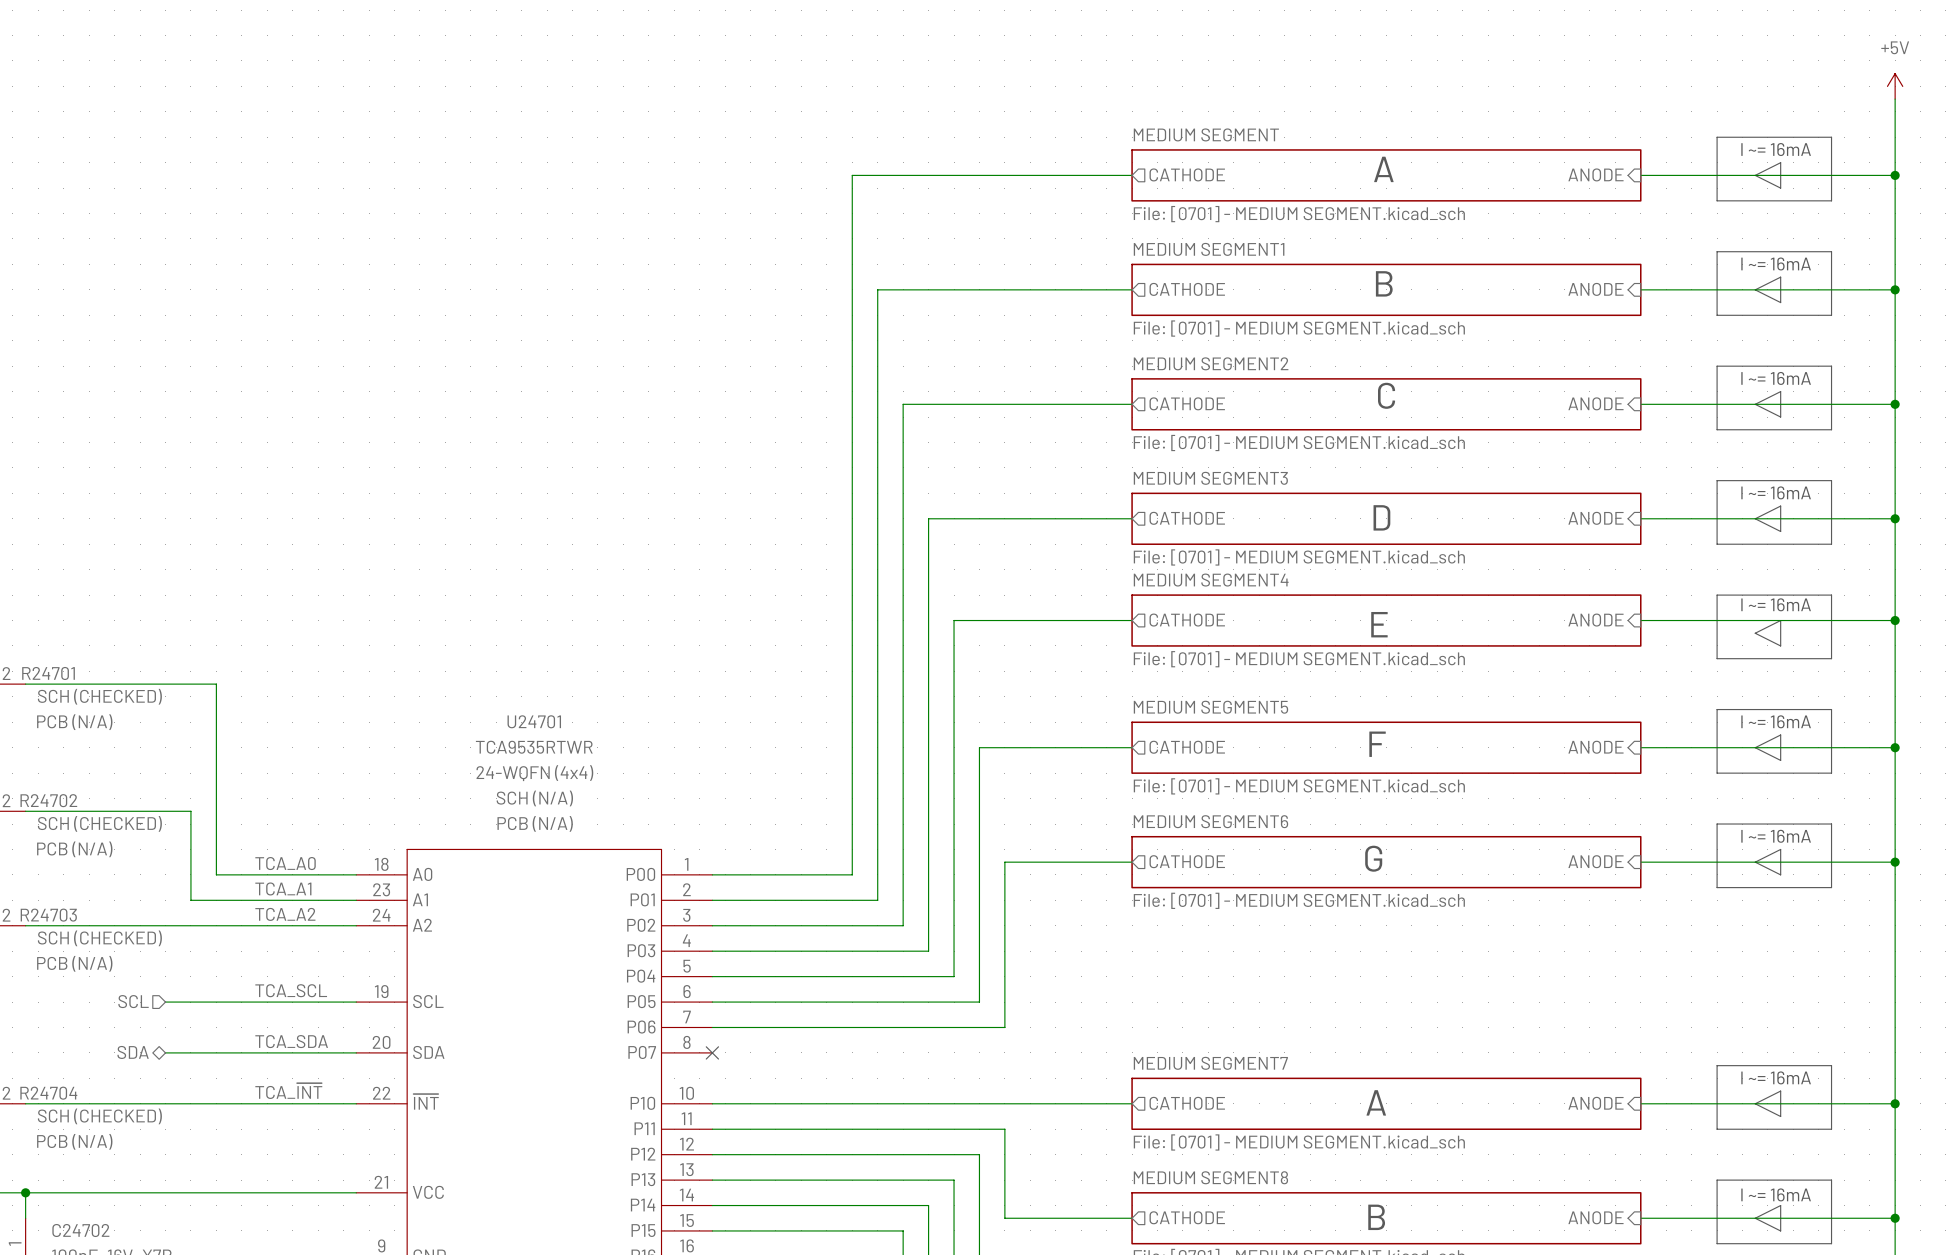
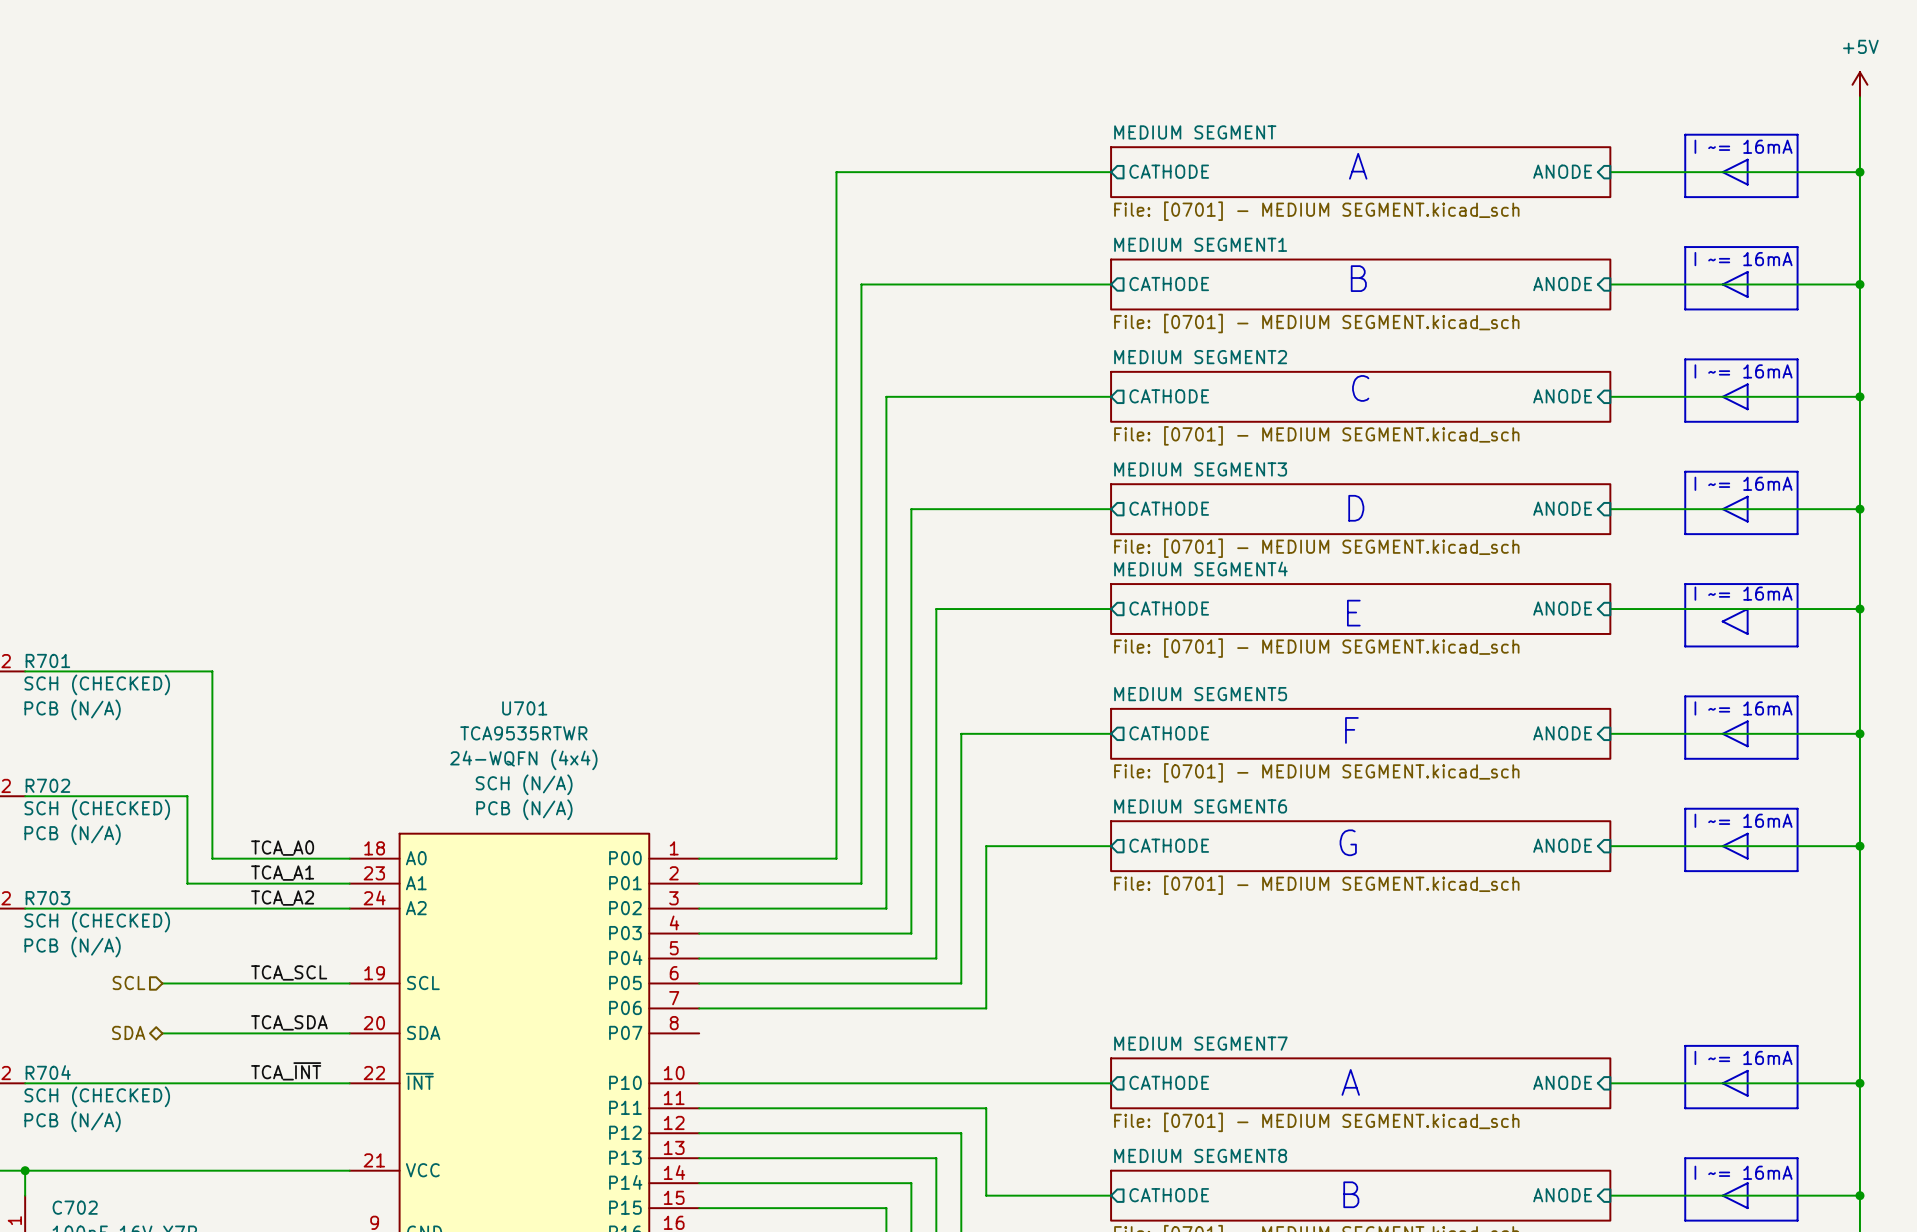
R24701 name: R24701 (48, 673) -> R701 (47, 660)
U24701 name: U24701 (534, 721) -> U701 (524, 708)
R24702 name: R24702 (48, 800) -> R702 (47, 785)
R24703 name: R24703 (48, 915) -> R703 (47, 898)
no-connect mark: (712, 1052) -> none
R24704 name: R24704 (48, 1093) -> R704 (48, 1072)
C24702 name: C24702 (80, 1230) -> C702 (75, 1207)

